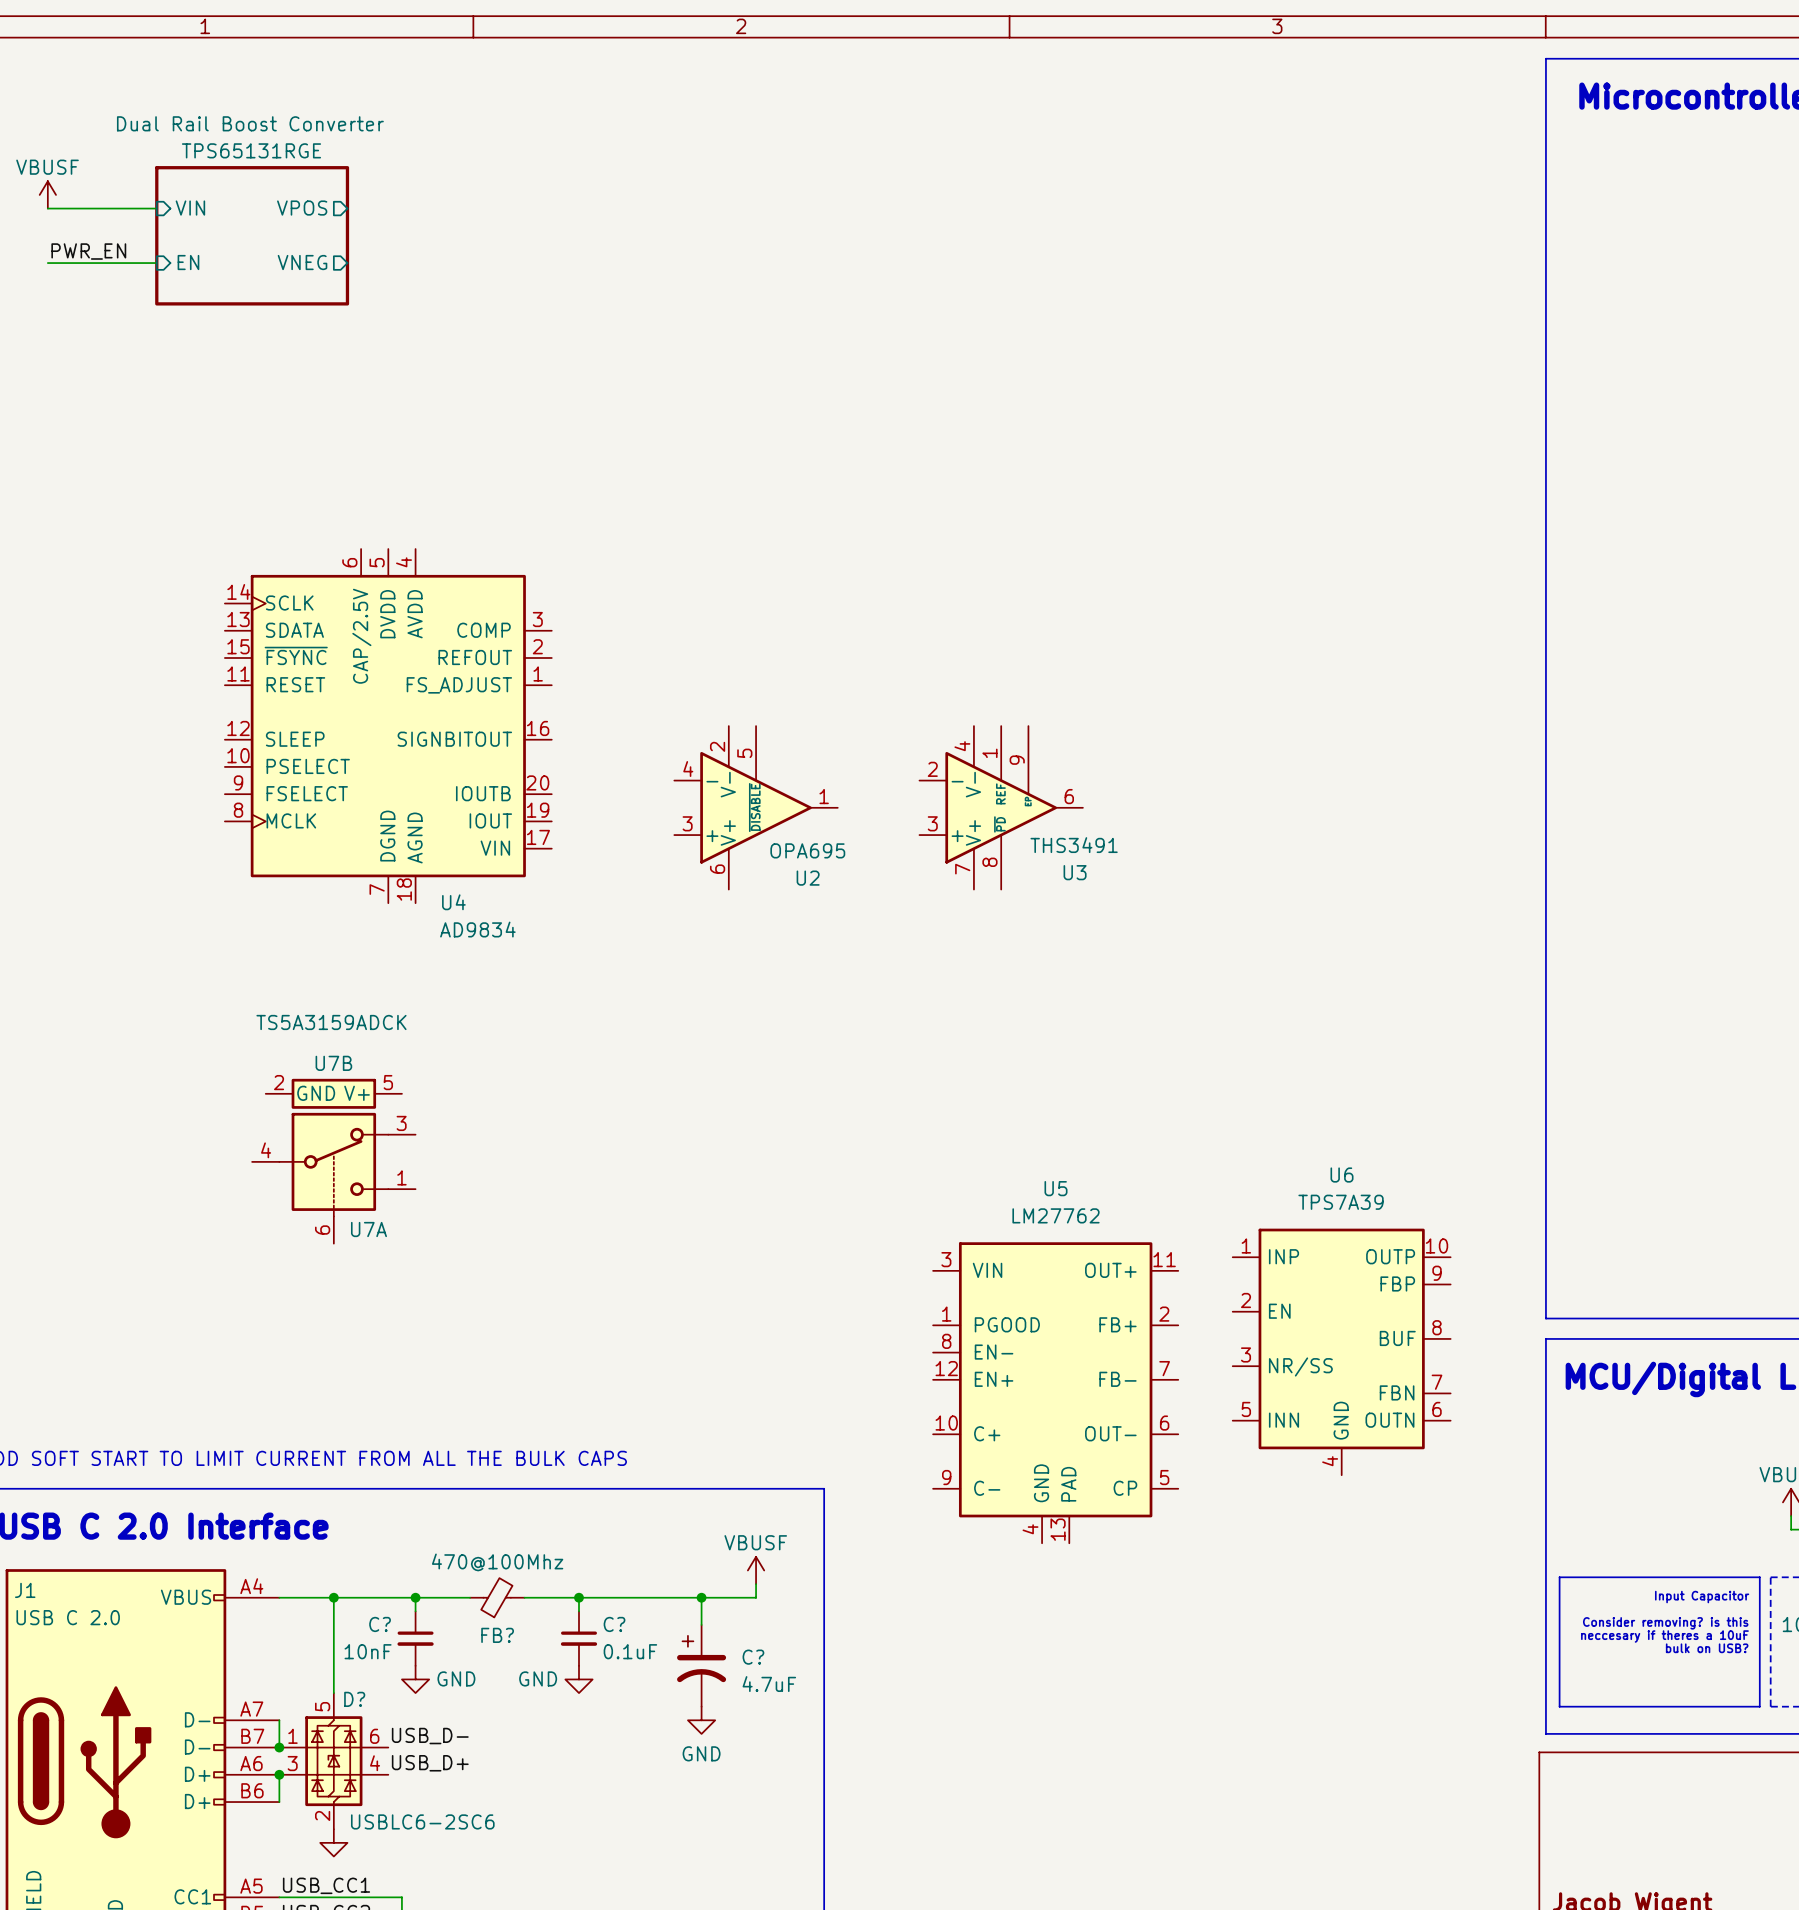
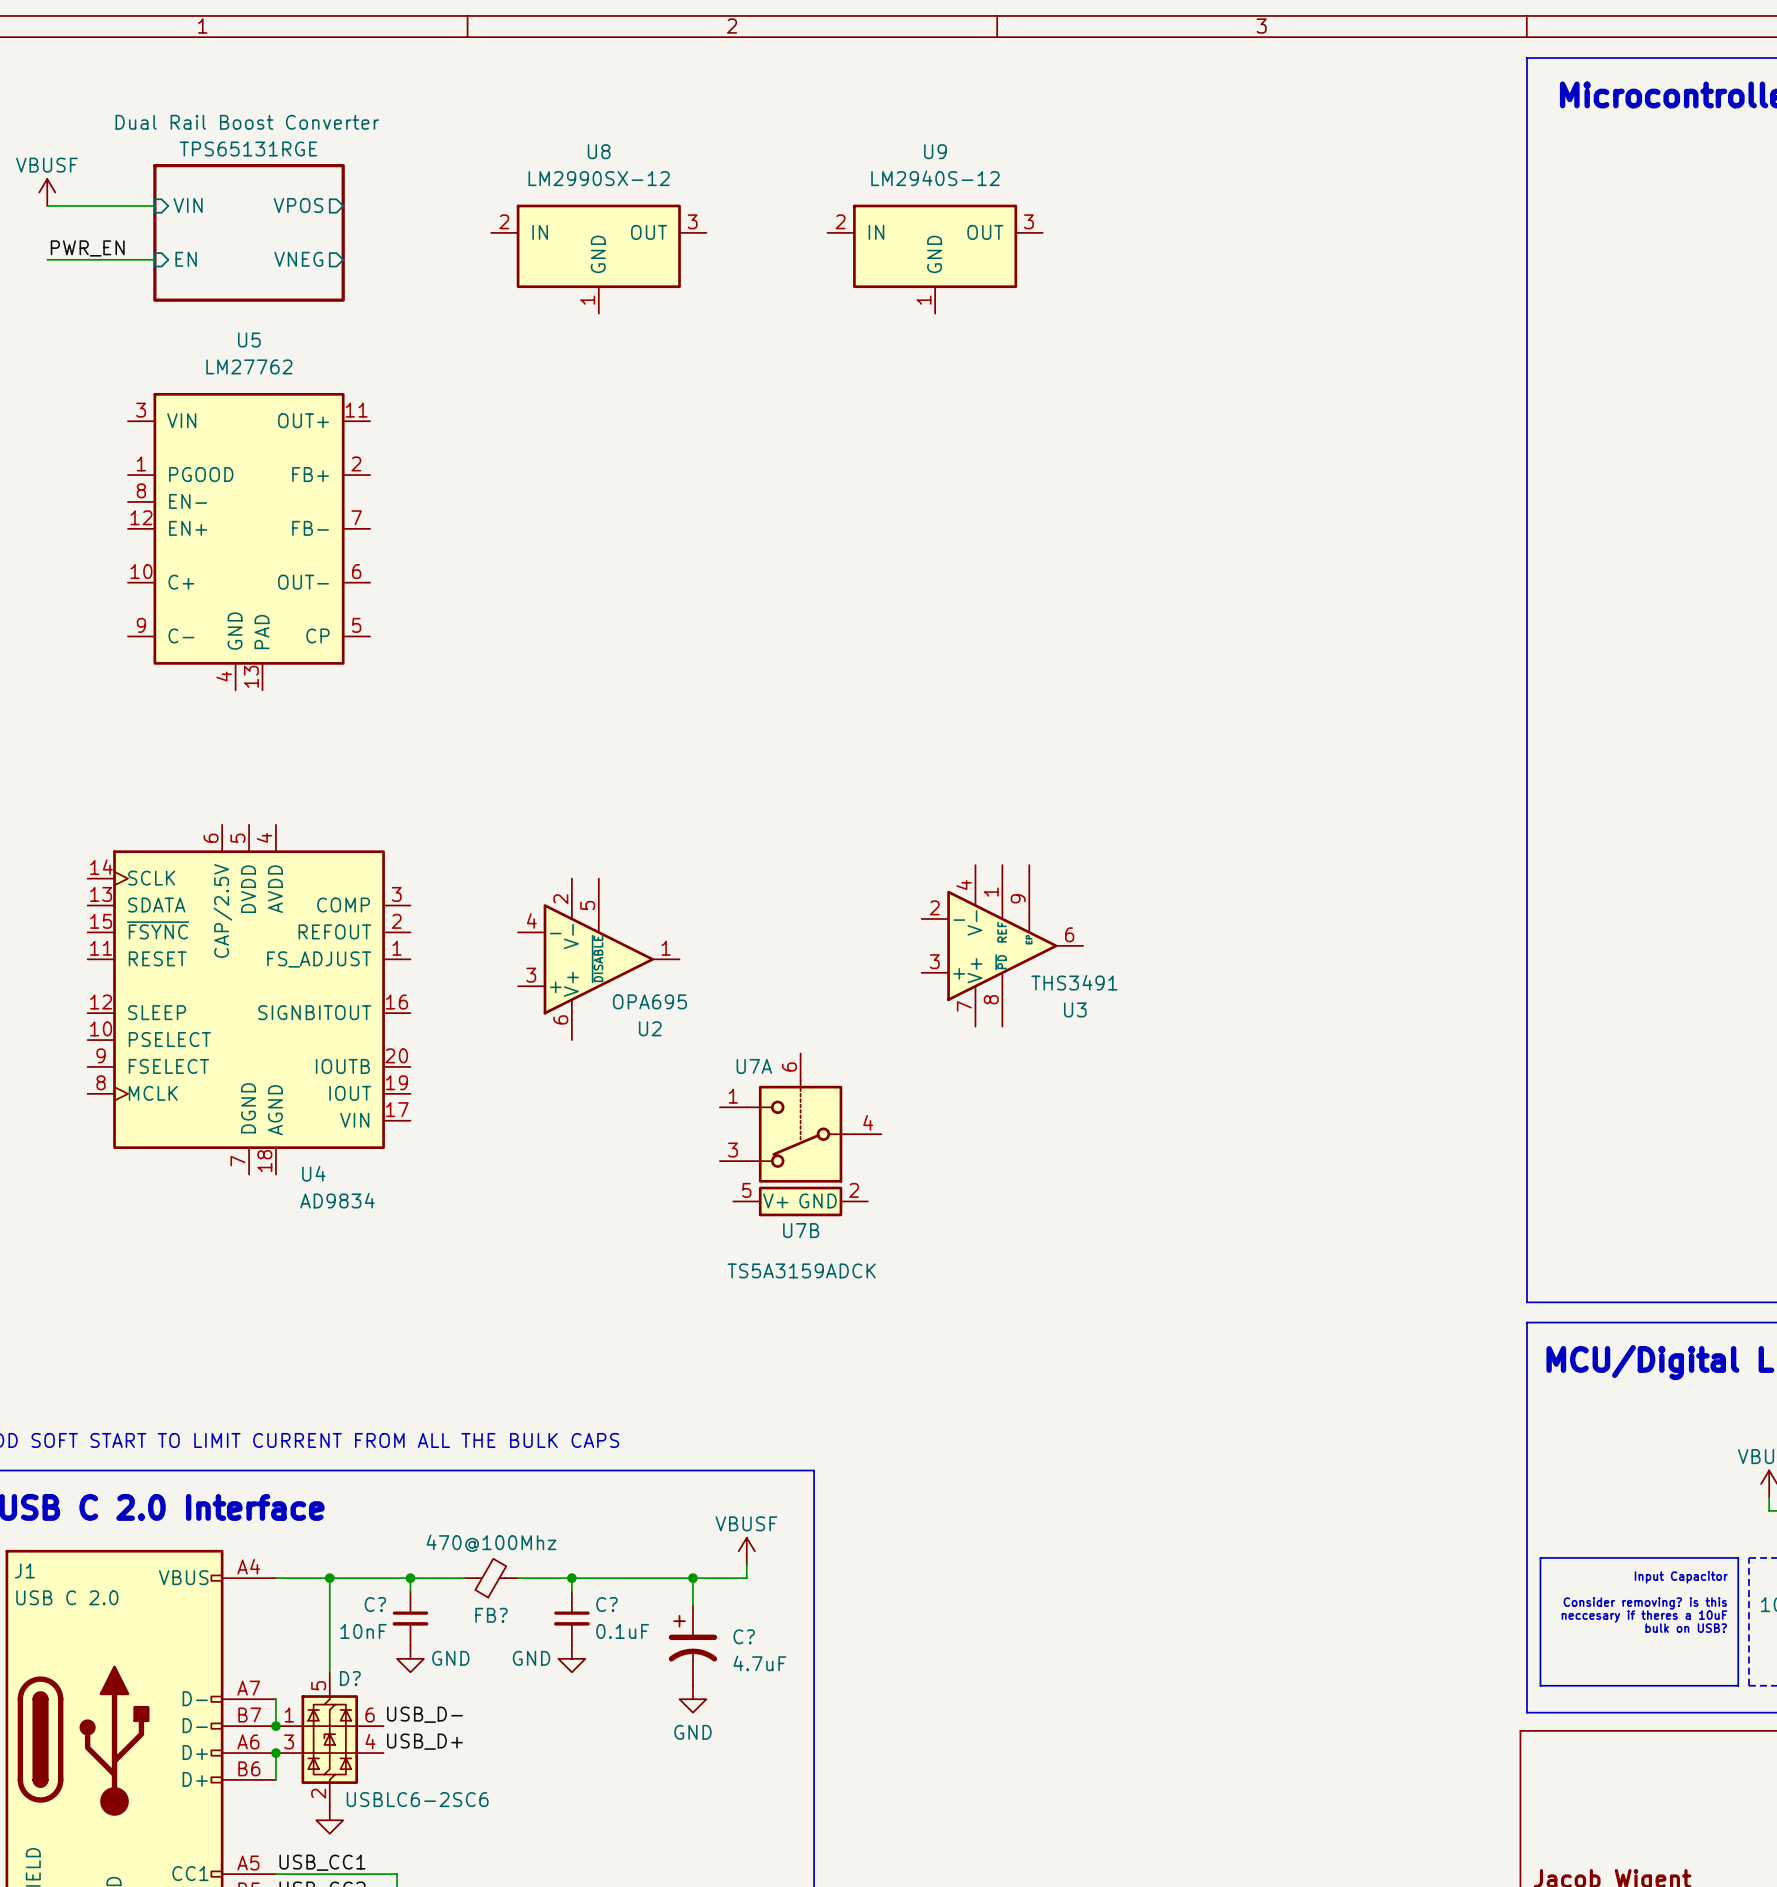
U8: none -> LM2990SX-12 (598, 259)
U9: none -> LM2940S-12 (935, 259)
U4 position: (388, 726) -> (249, 999)
U2 position: (756, 807) -> (598, 959)
U3 position: (1001, 807) -> (1002, 945)
U7B rotation: 0° (333, 1093) -> 180° (800, 1201)
U7B position: (333, 1093) -> (800, 1201)
U7A rotation: 0° (333, 1164) -> 180° (800, 1131)
U7A position: (333, 1178) -> (800, 1118)
U6: TPS7A39 (1341, 1351) -> none
U5 position: (1055, 1392) -> (249, 541)

